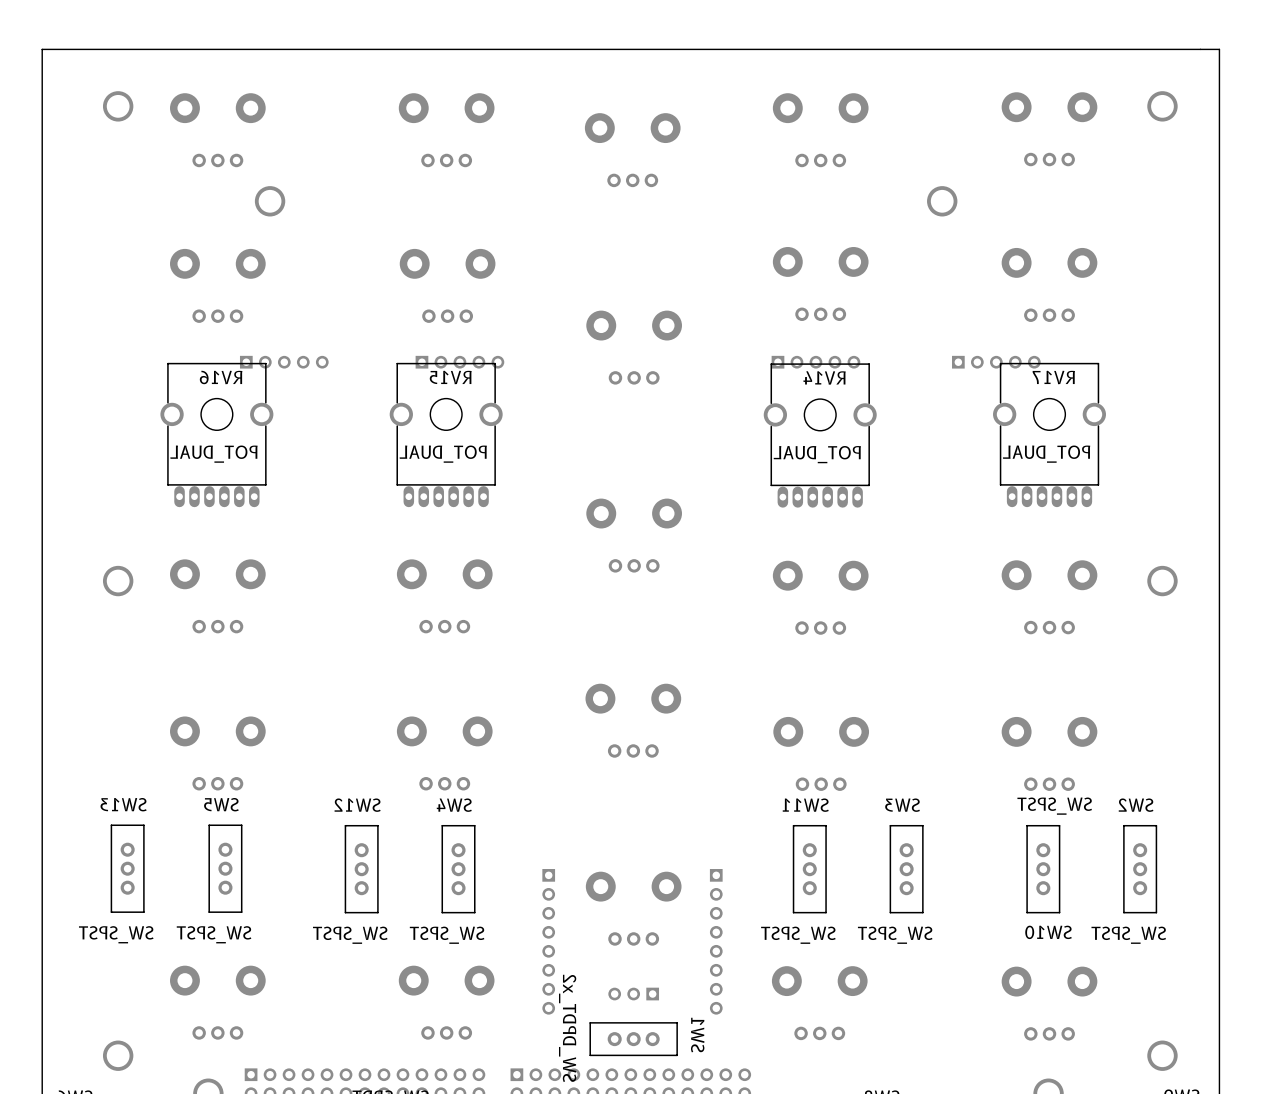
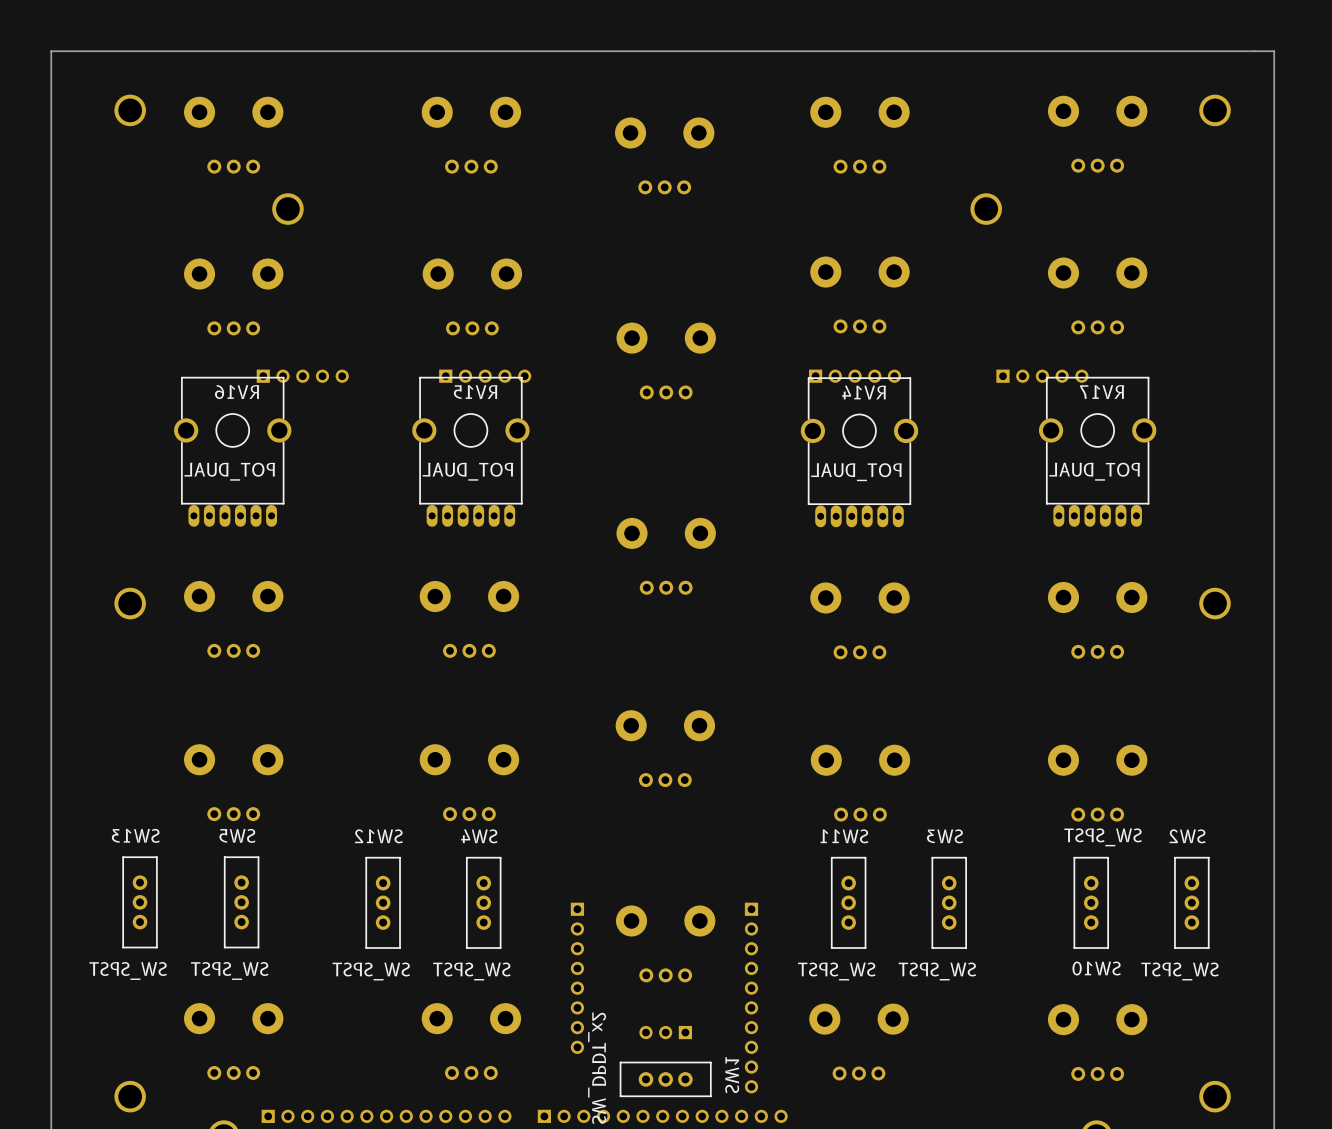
part: none -> (751, 998)

